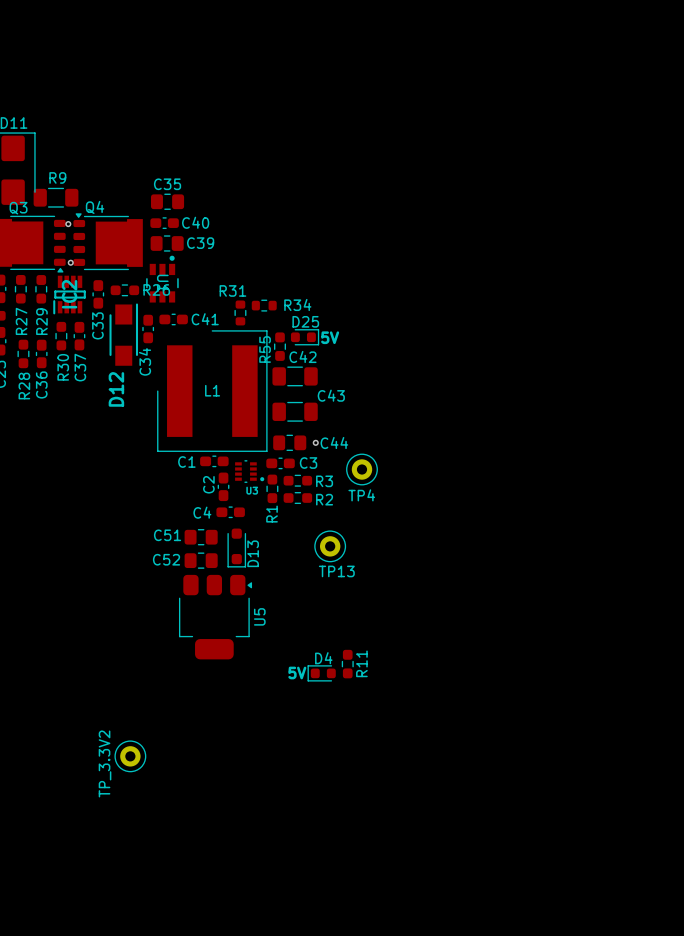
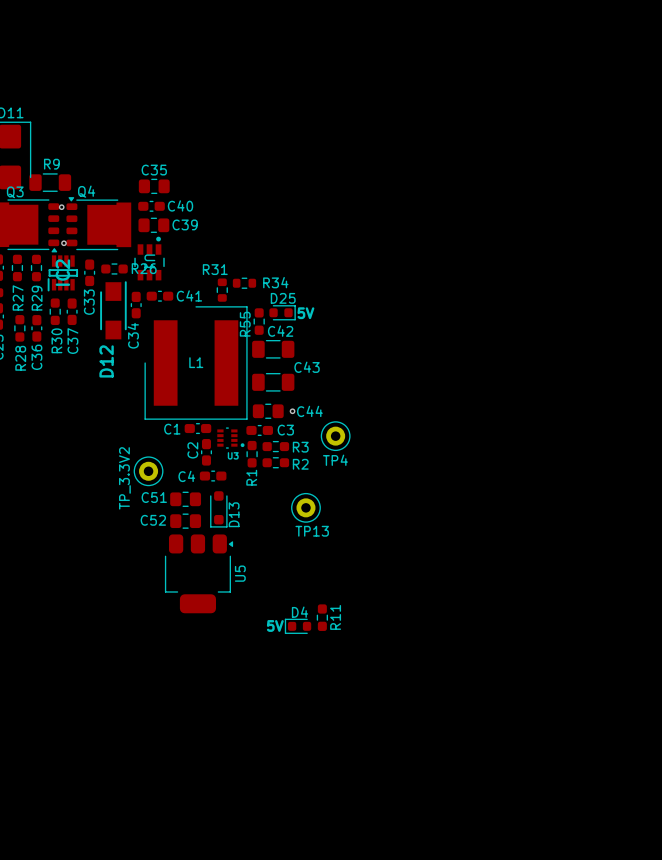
TP_3.3V2 position: (130, 756) -> (148, 471)

